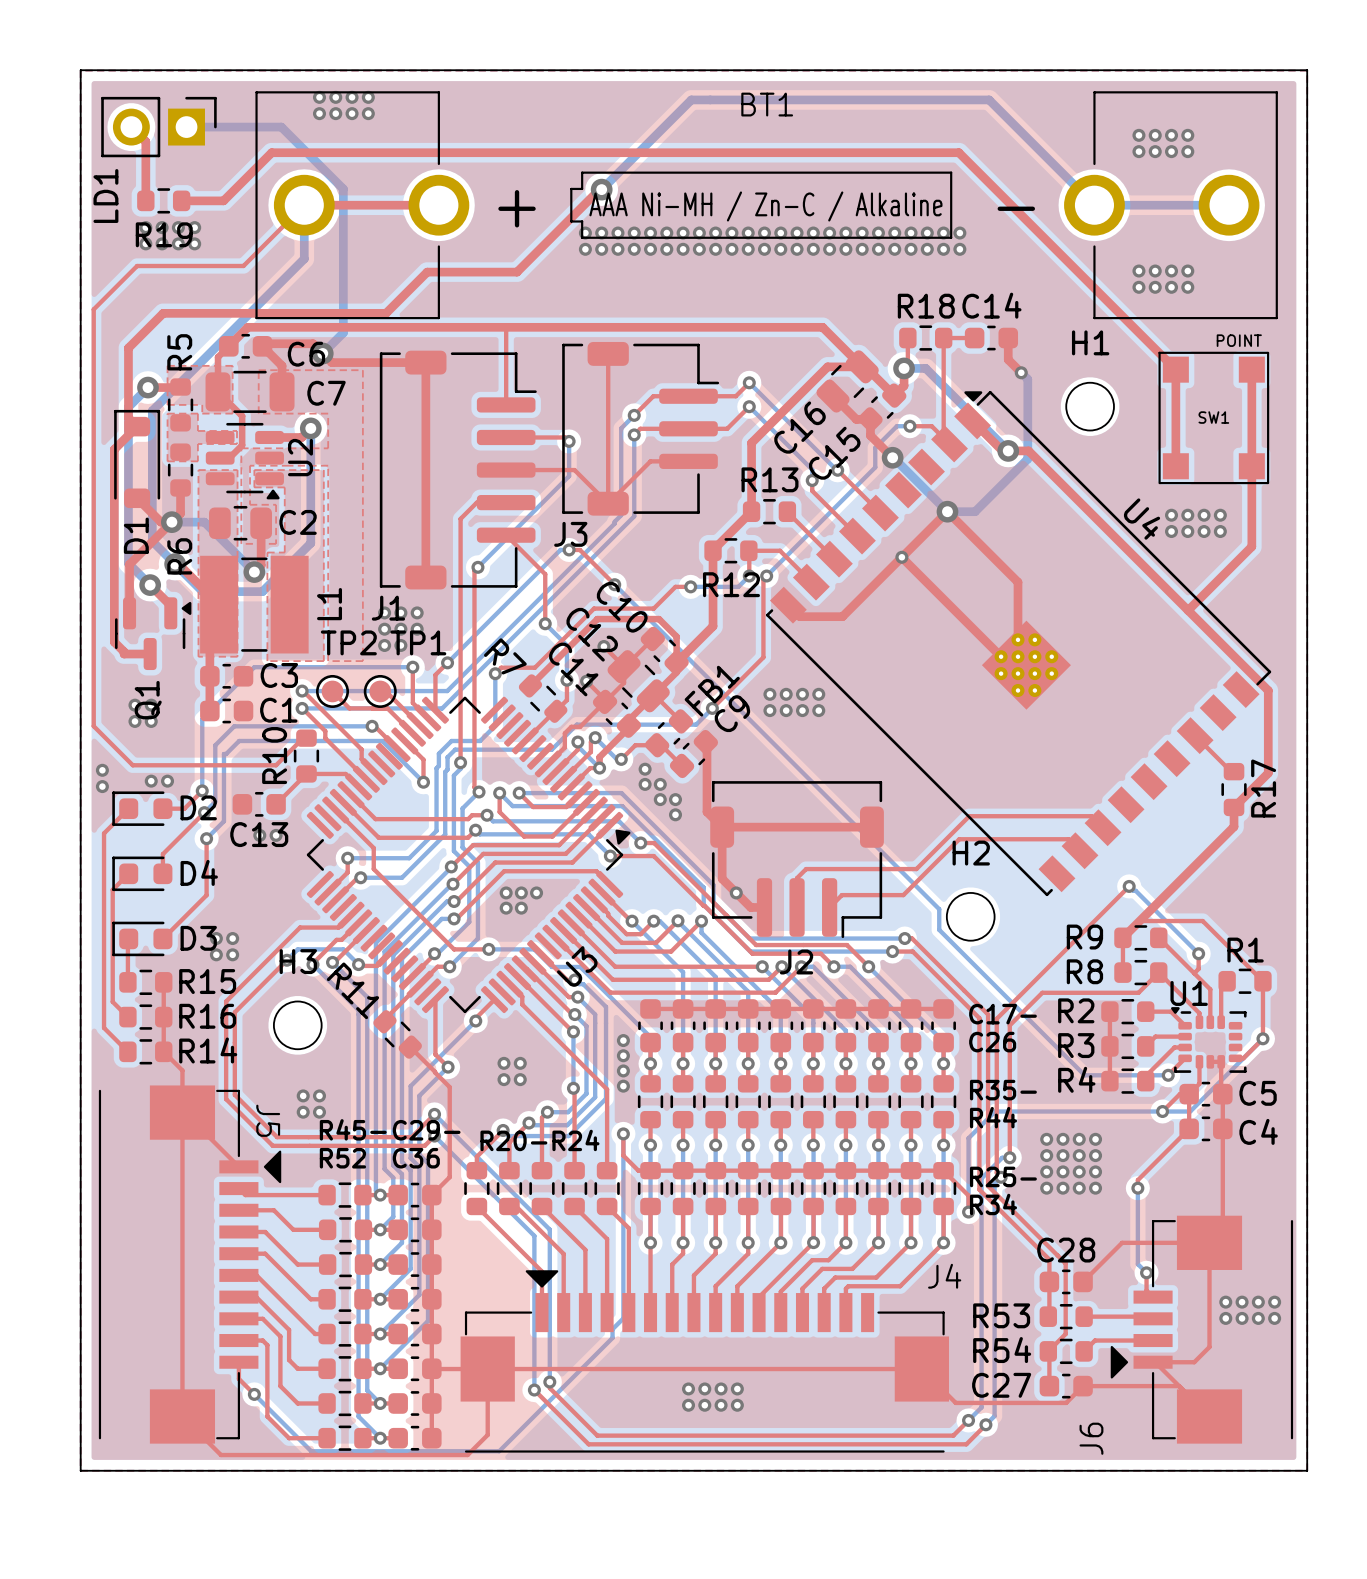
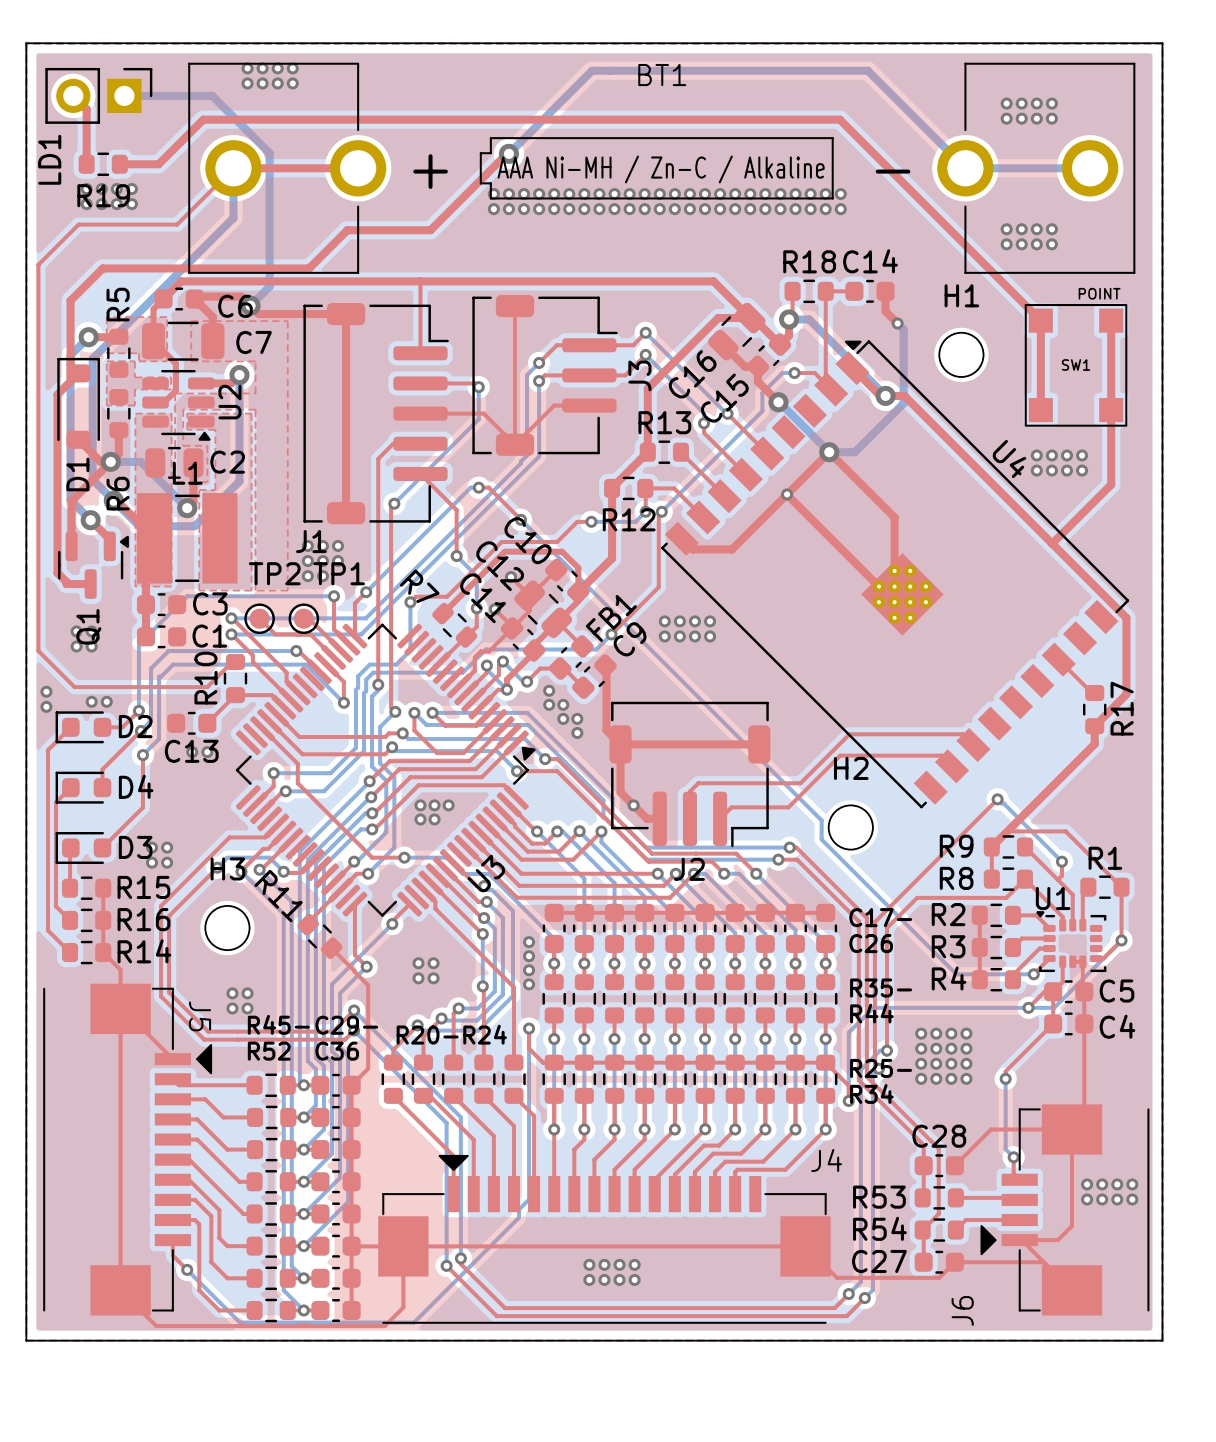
J3 name rotation: 0° (570, 534) -> 90° counterclockwise (639, 375)
J3 name position: J3 (570, 534) -> J3 (639, 375)
L1 name rotation: 0° (329, 604) -> 90° clockwise (187, 473)
L1 name position: L1 (329, 604) -> L1 (187, 473)

